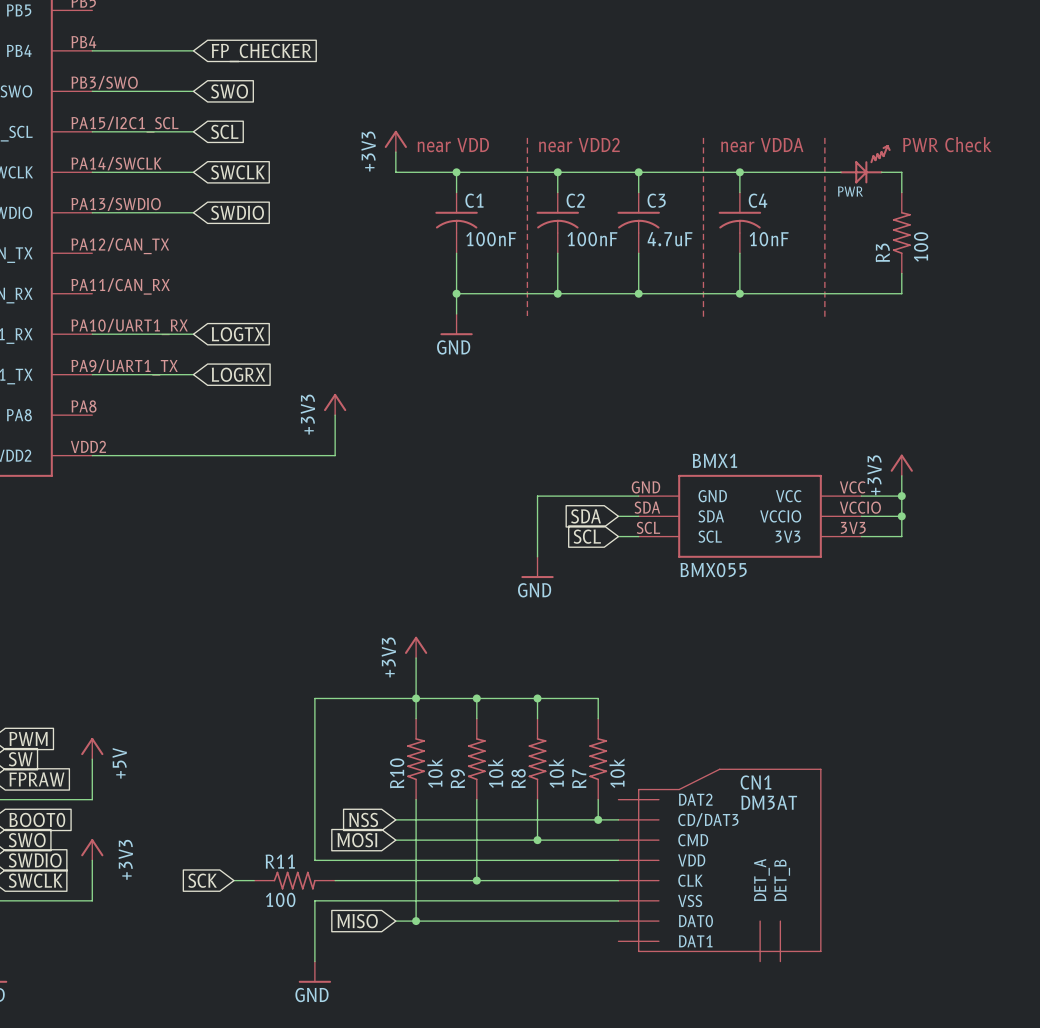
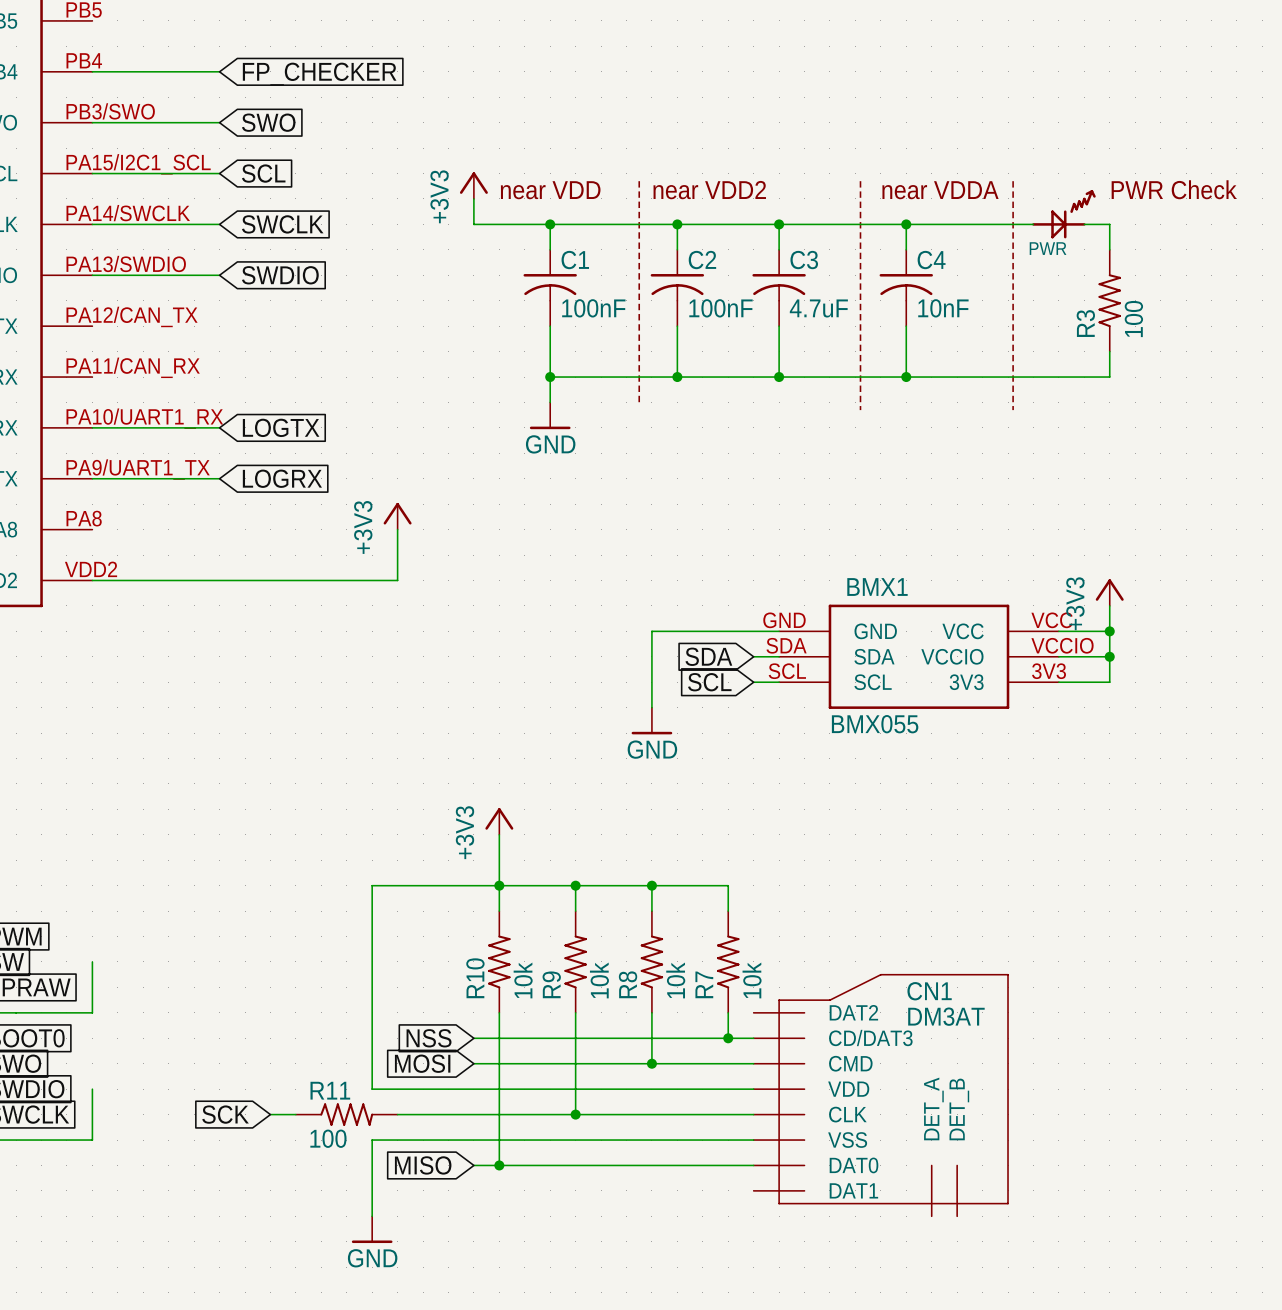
power symbol: +5V (92, 748) -> none
power symbol: +3V3 (92, 849) -> none

